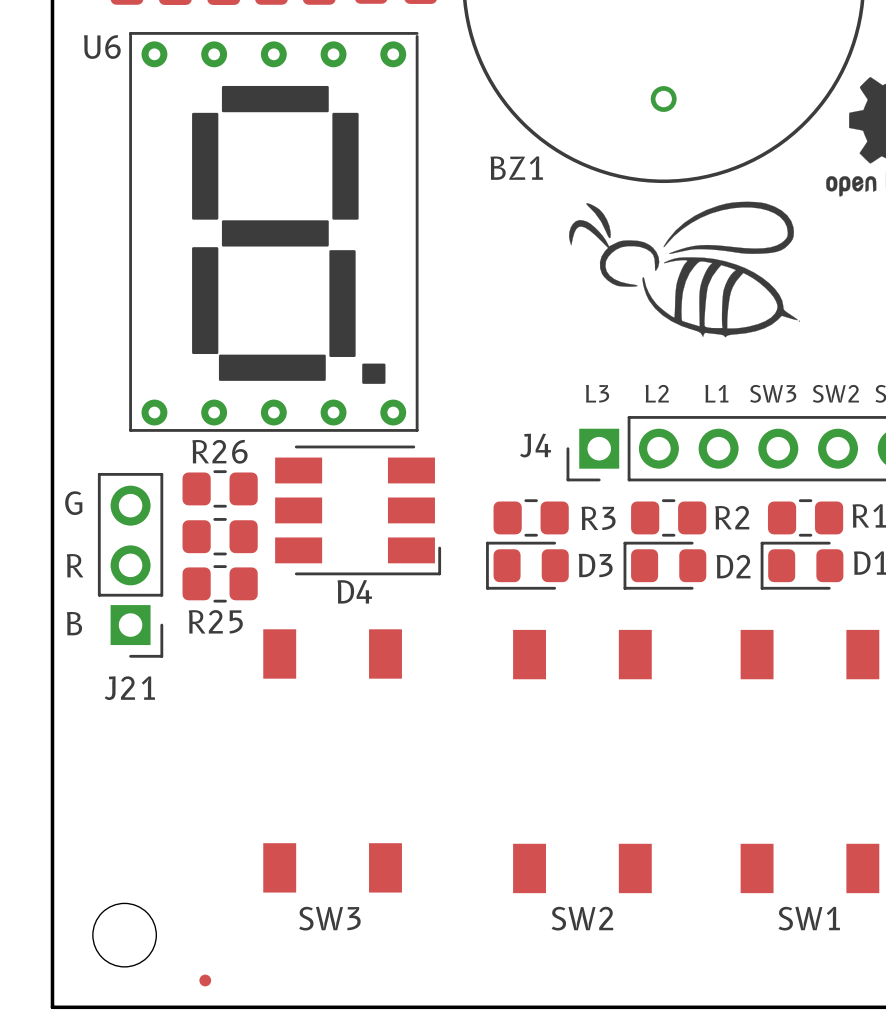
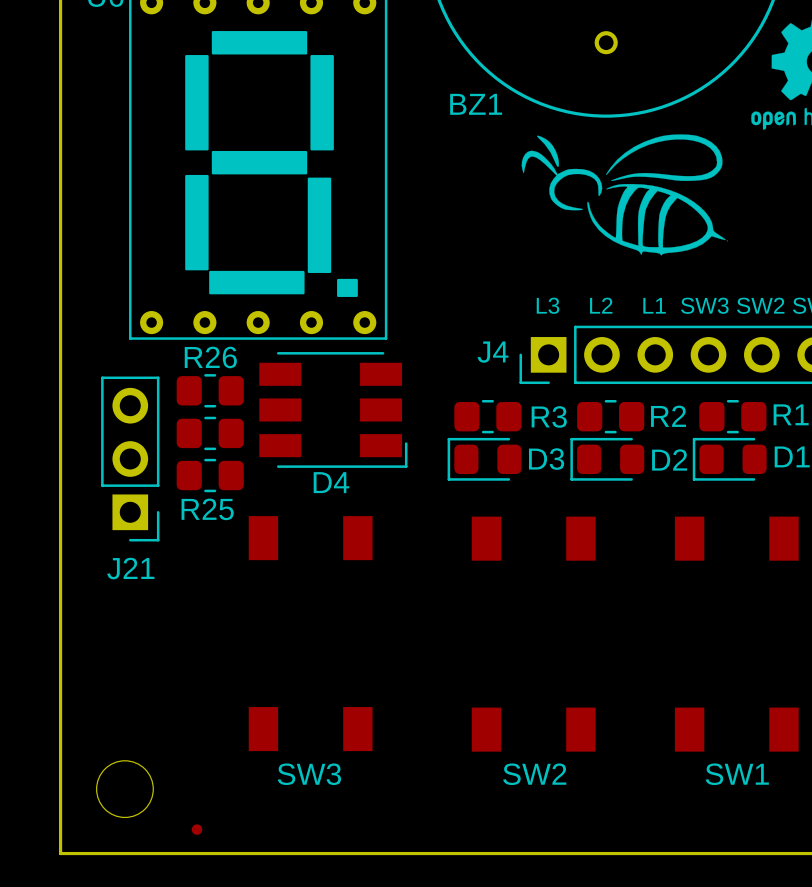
text: G (73, 503) -> none
text: R (75, 565) -> none
text: B (74, 623) -> none

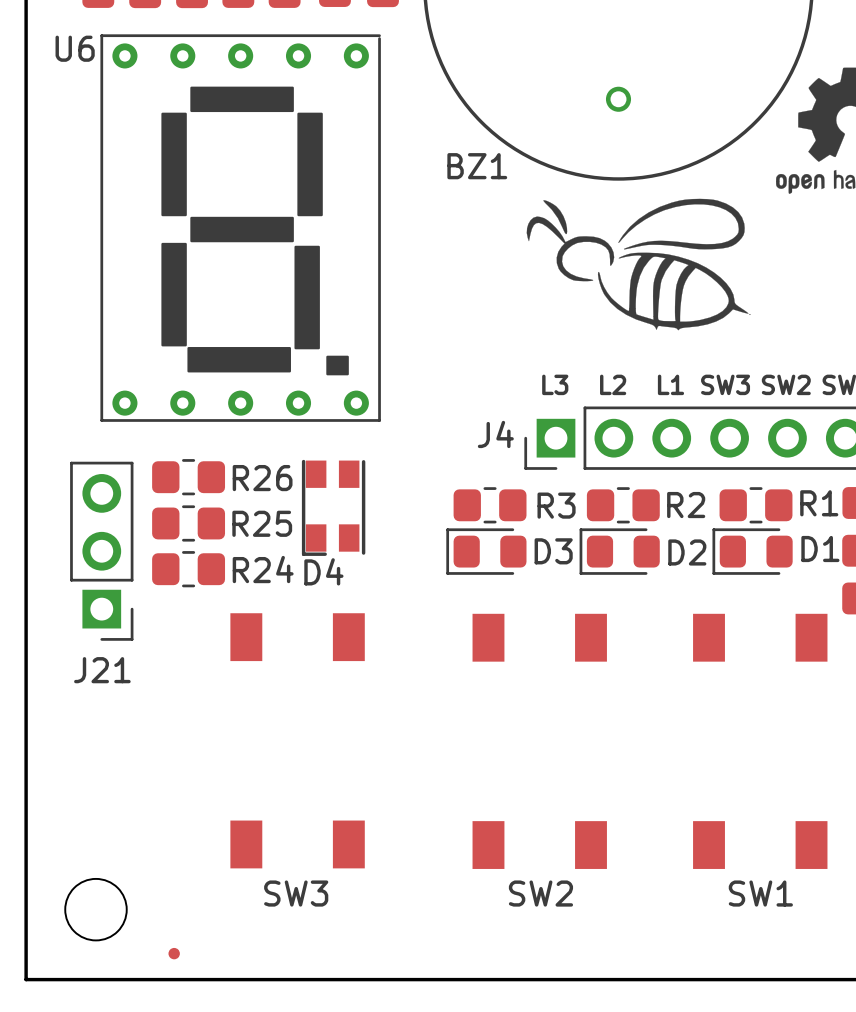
D4 footprint: [259, 352, 408, 468] -> [301, 459, 366, 556]
R26 name position: R26 (210, 357) -> R26 (262, 478)
R25 name: none -> R25 (262, 523)
R25 name: R25 (207, 509) -> R24 (263, 569)

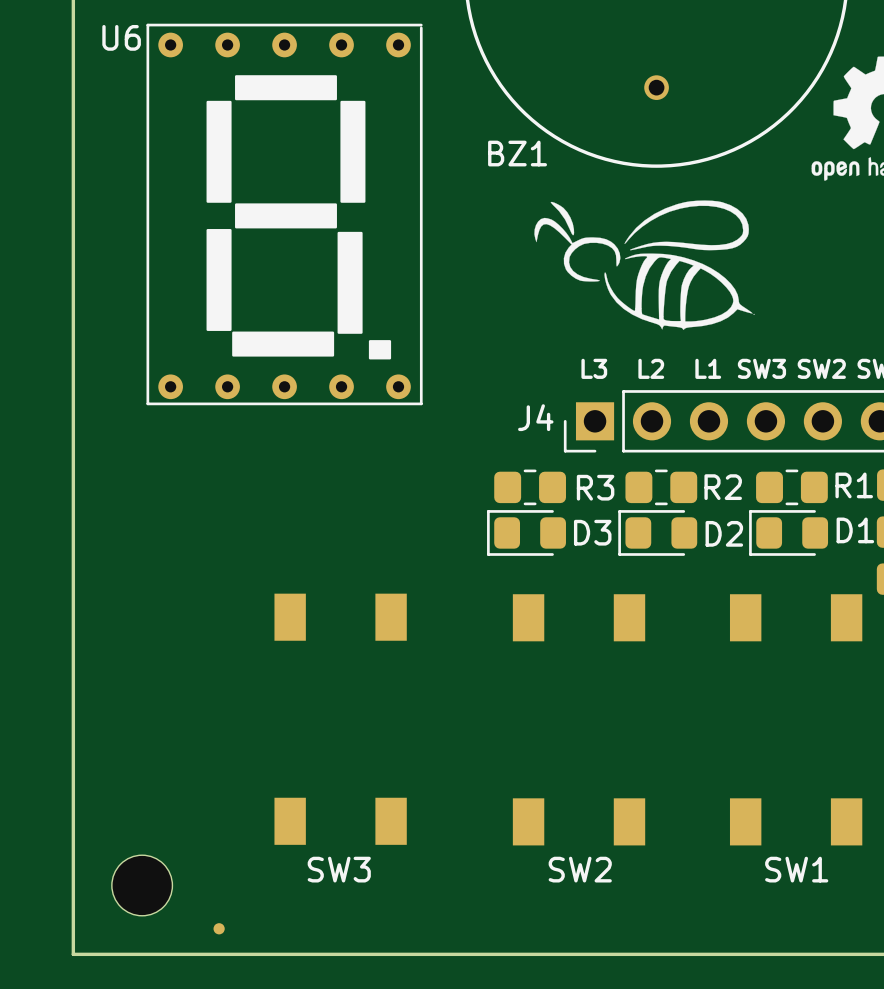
drawing position: (638, 264) -> (644, 265)
R26: (188, 477) -> none
D4: (333, 507) -> none
R25: (188, 523) -> none
J21: (101, 551) -> none
R24: (188, 569) -> none

